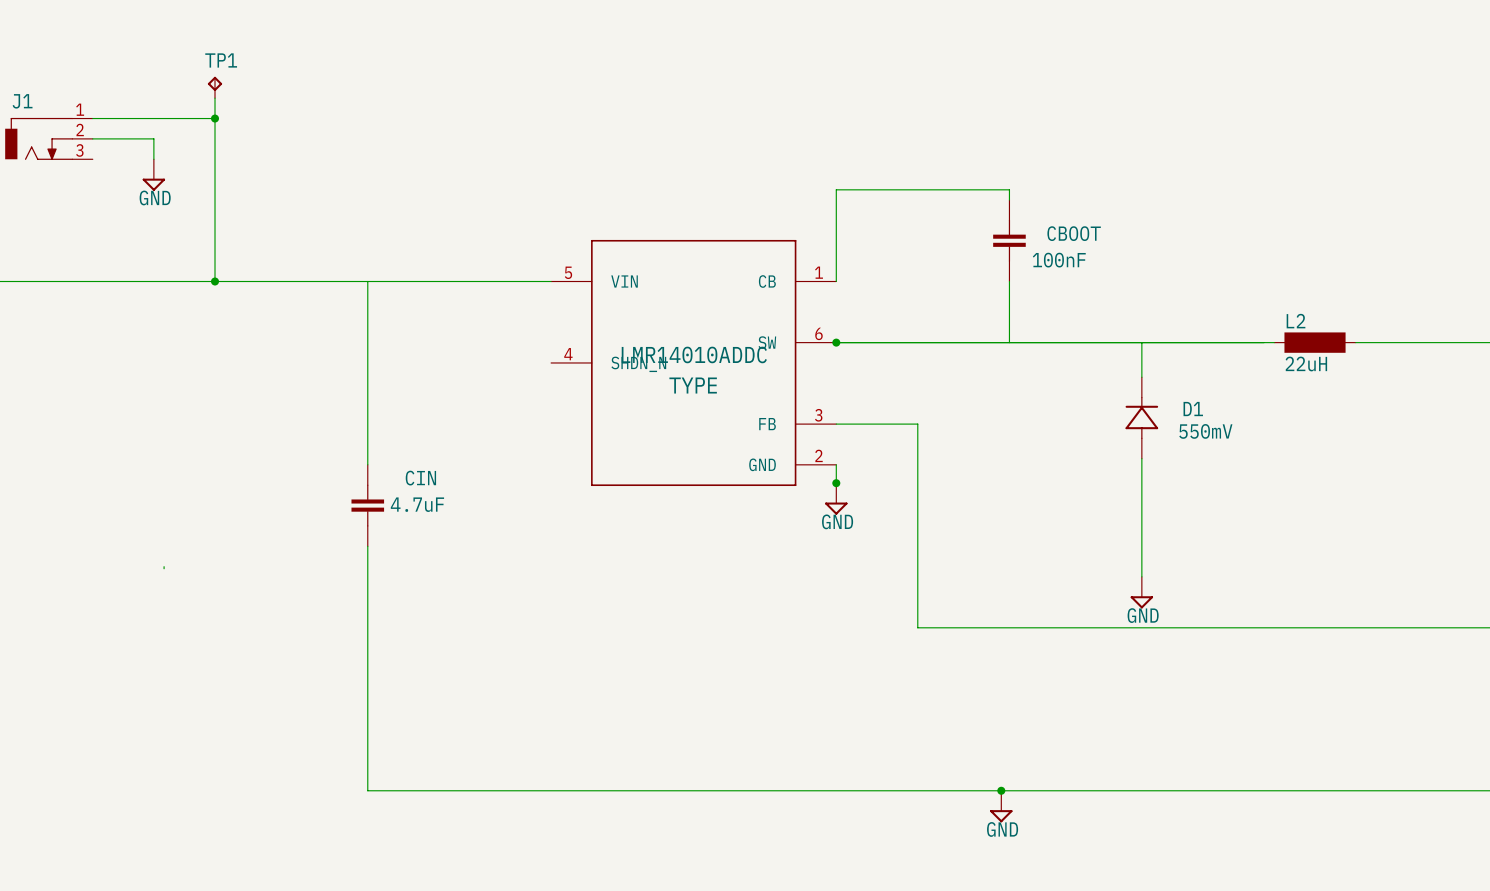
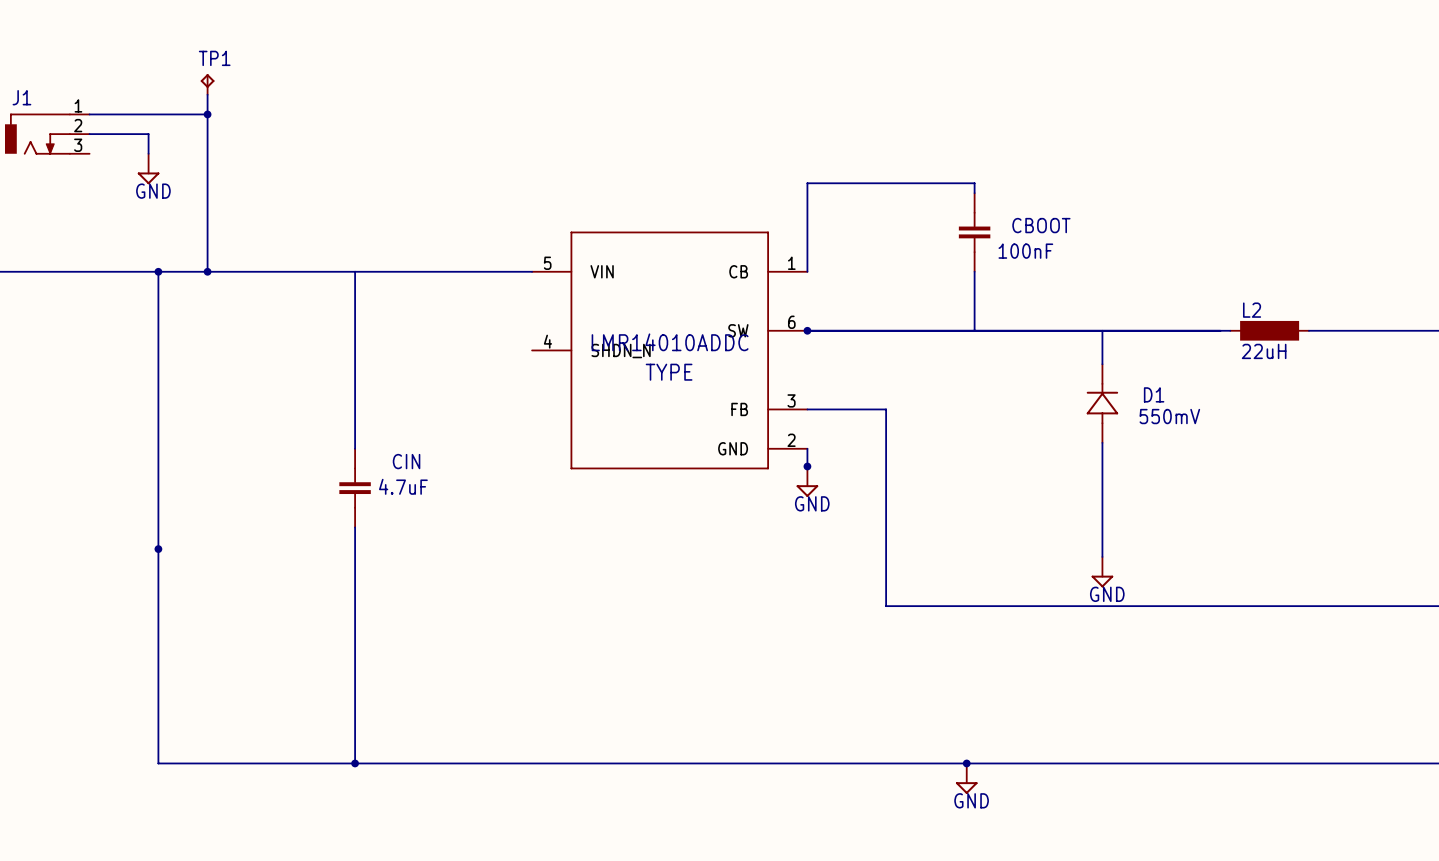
wire: none -> (158, 271) (158, 547)
junction: none -> (158, 271)
wire: none -> (158, 549) (158, 763) (355, 763)
junction: none -> (158, 549)
junction: none -> (355, 763)

